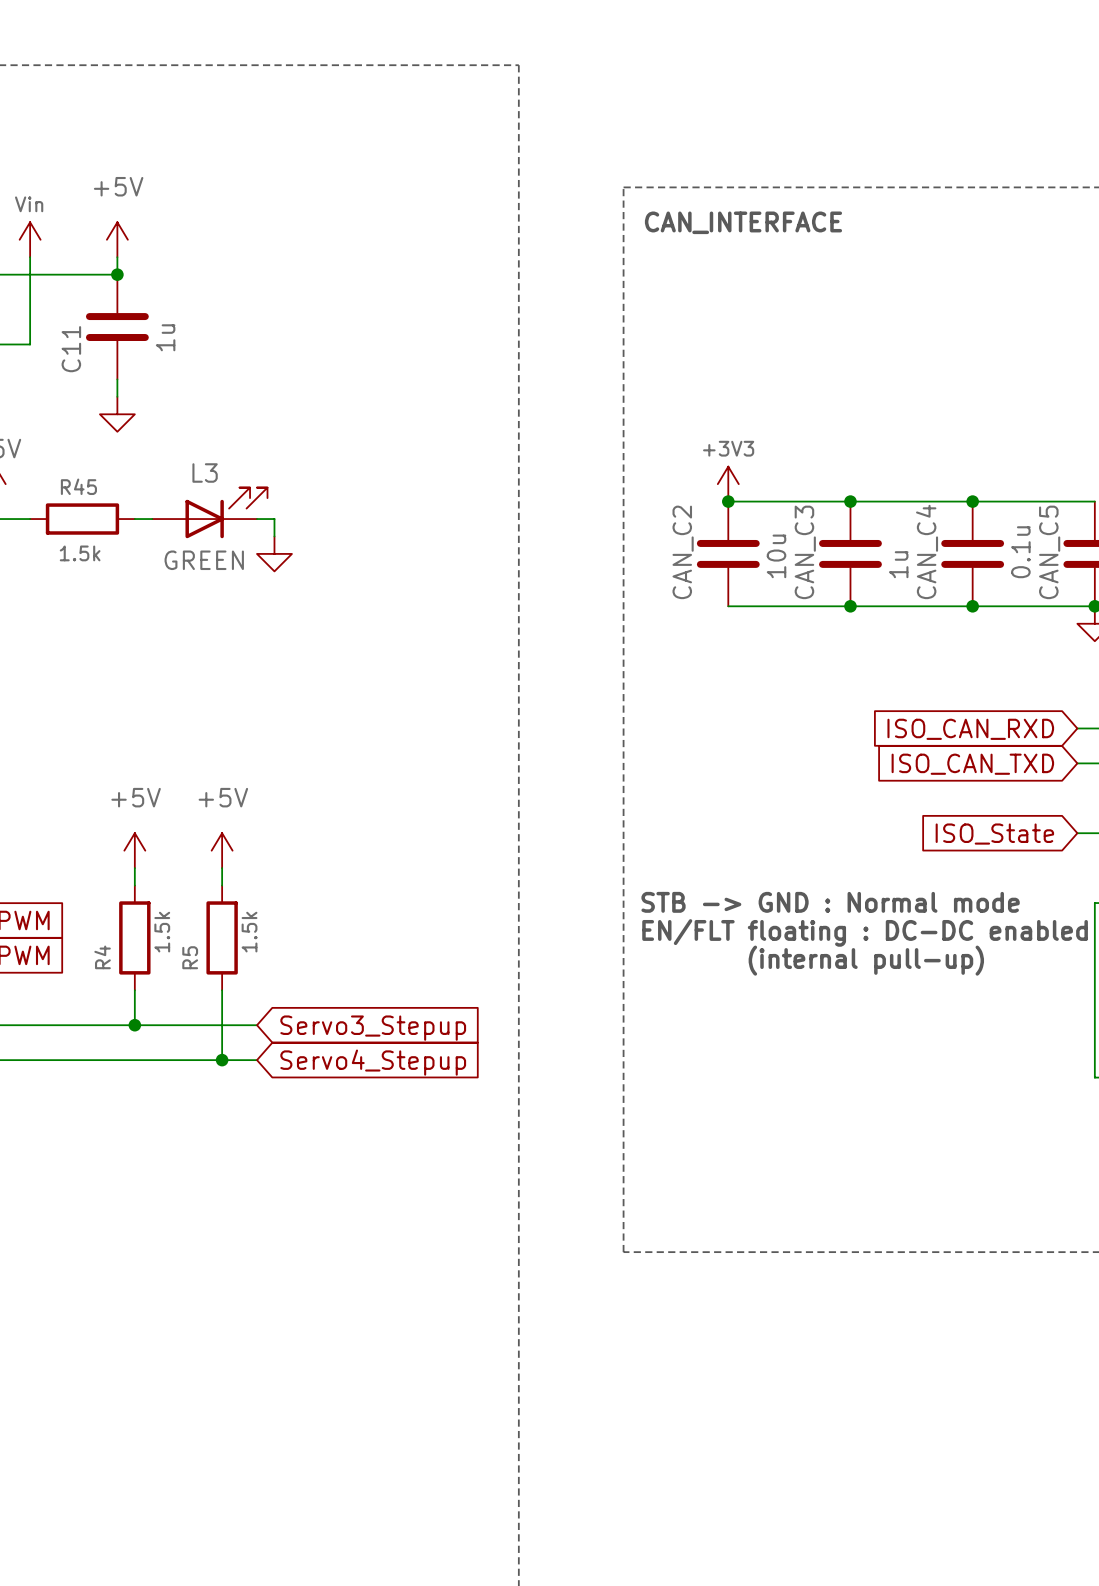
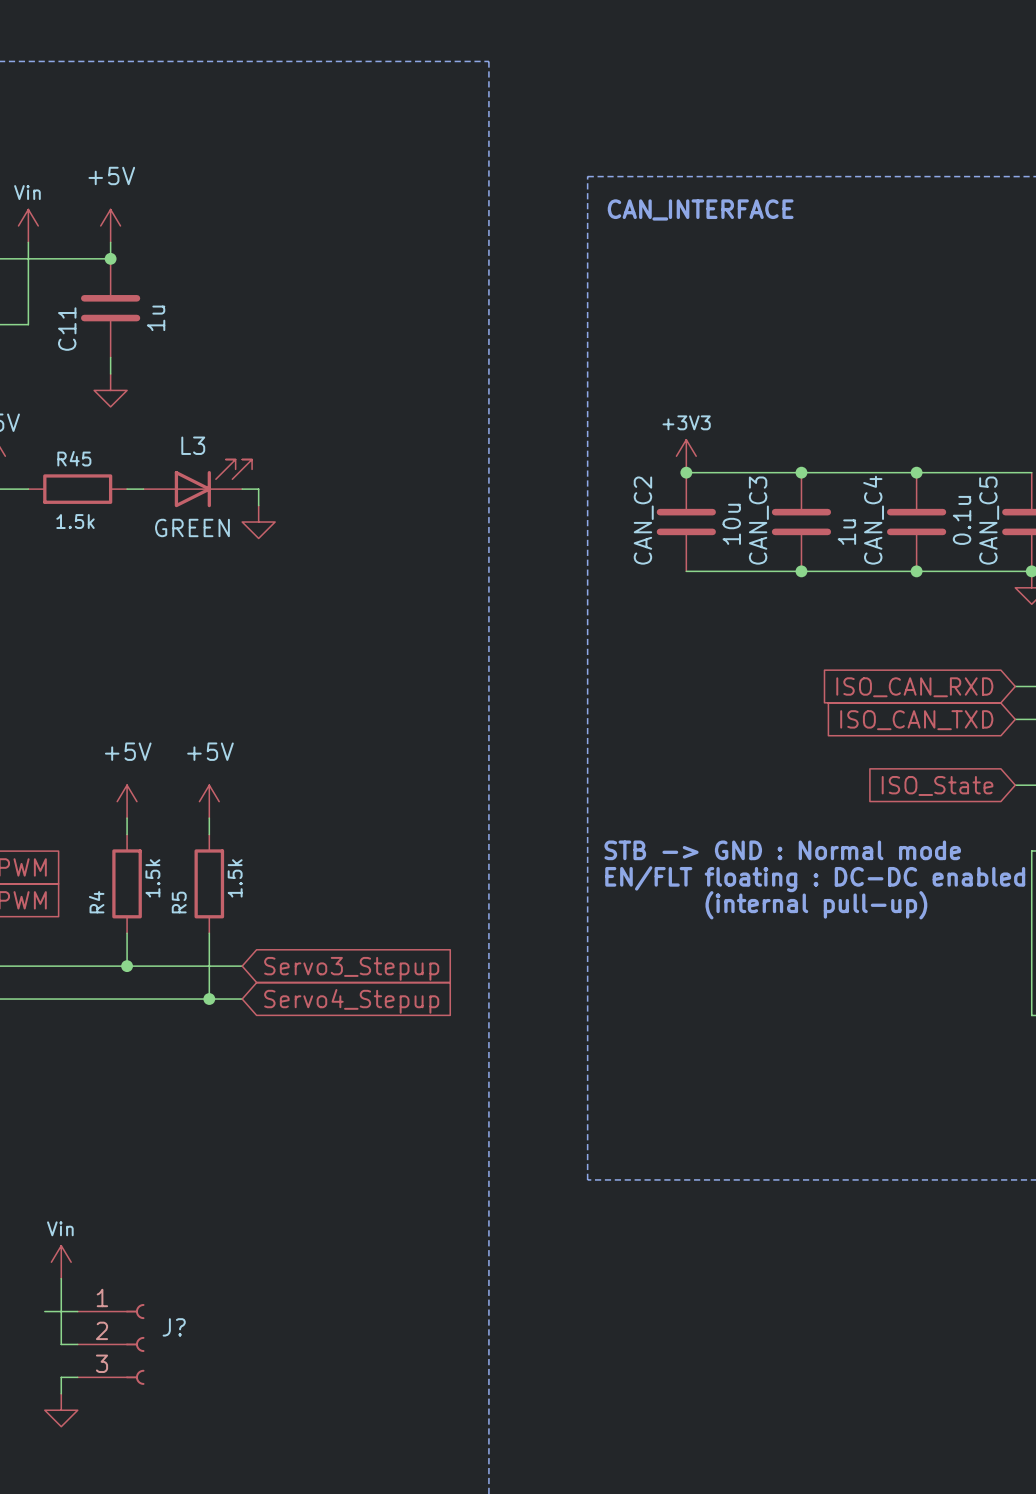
power symbol: none -> Vin (61, 1262)
wire: none -> (61, 1278) (61, 1344) (77, 1344)
wire: none -> (44, 1311) (77, 1311)
J?: none -> (111, 1344)
wire: none -> (77, 1377) (61, 1377) (61, 1393)
power symbol: none -> (61, 1410)

